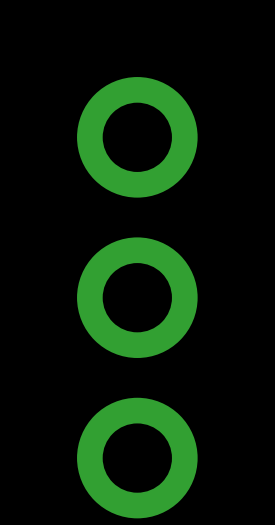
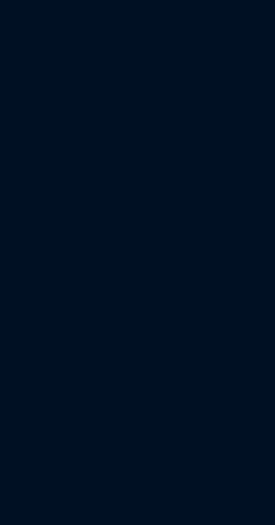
part: (137, 137) -> none
part: (137, 297) -> none
part: (137, 458) -> none

